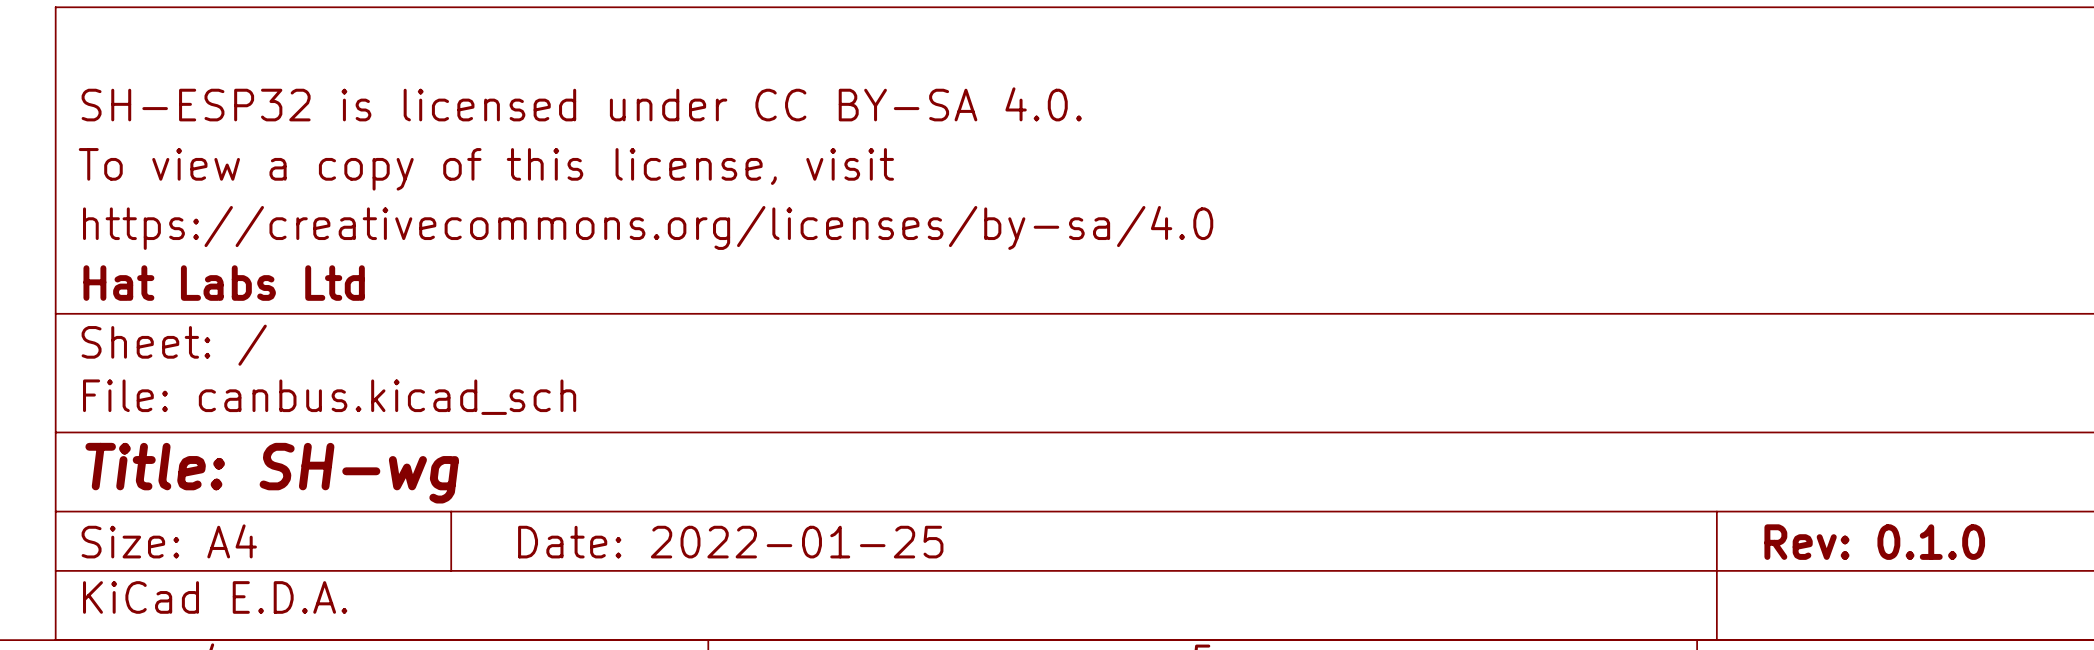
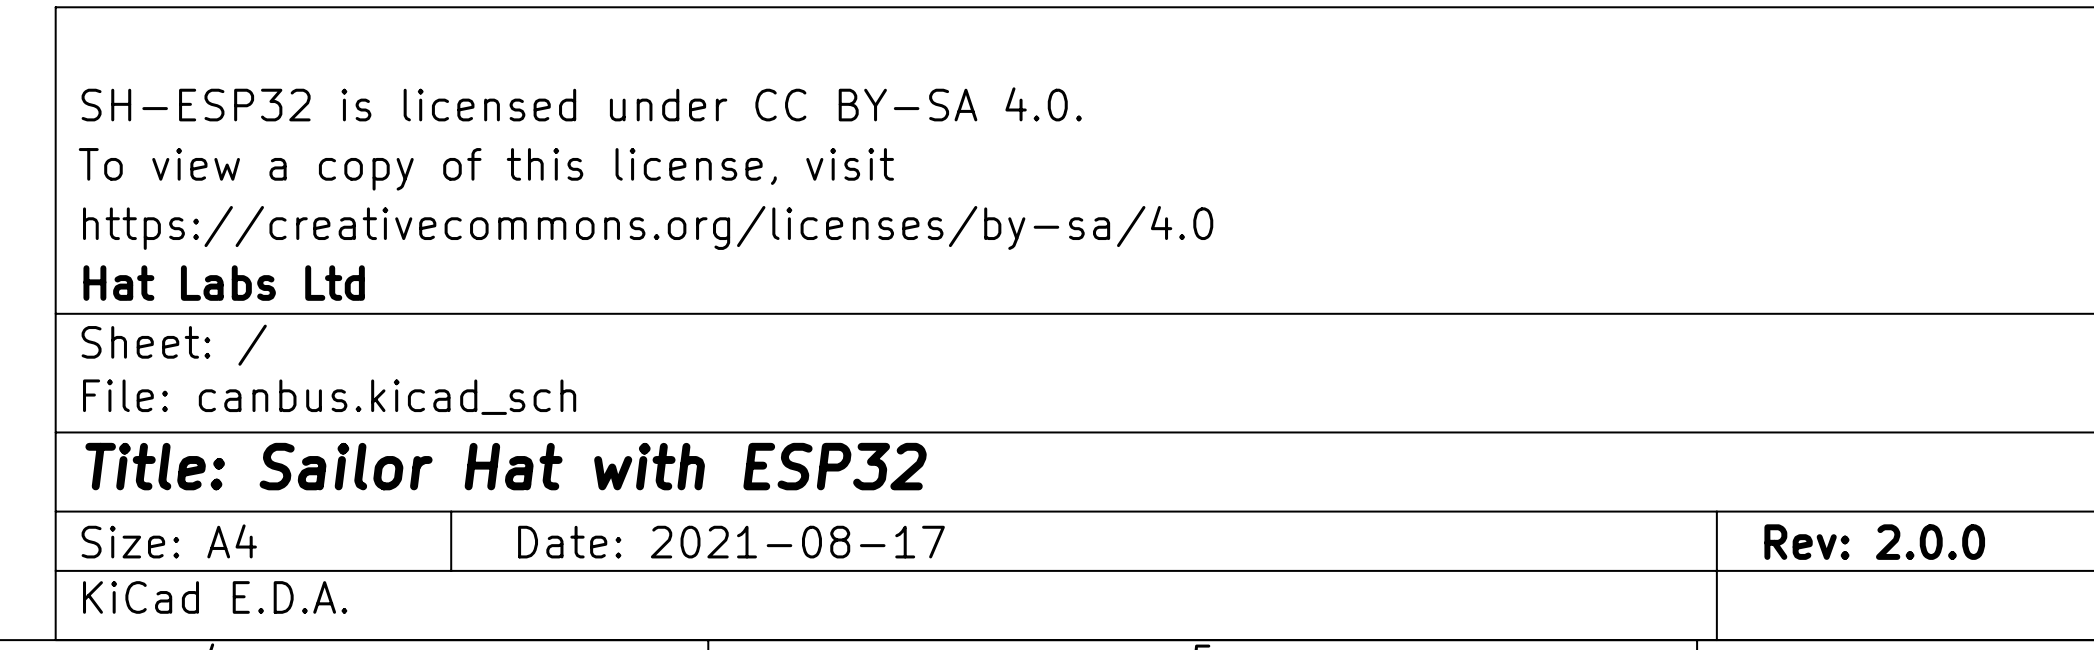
title block: Title: SH-wg (272, 473) -> Title: Sailor Hat with ESP32 (506, 466)
title block: Date: 2022-01-25 (730, 542) -> Date: 2021-08-17 (731, 542)
title block: Rev: 0.1.0 (1874, 542) -> Rev: 2.0.0 (1874, 542)

